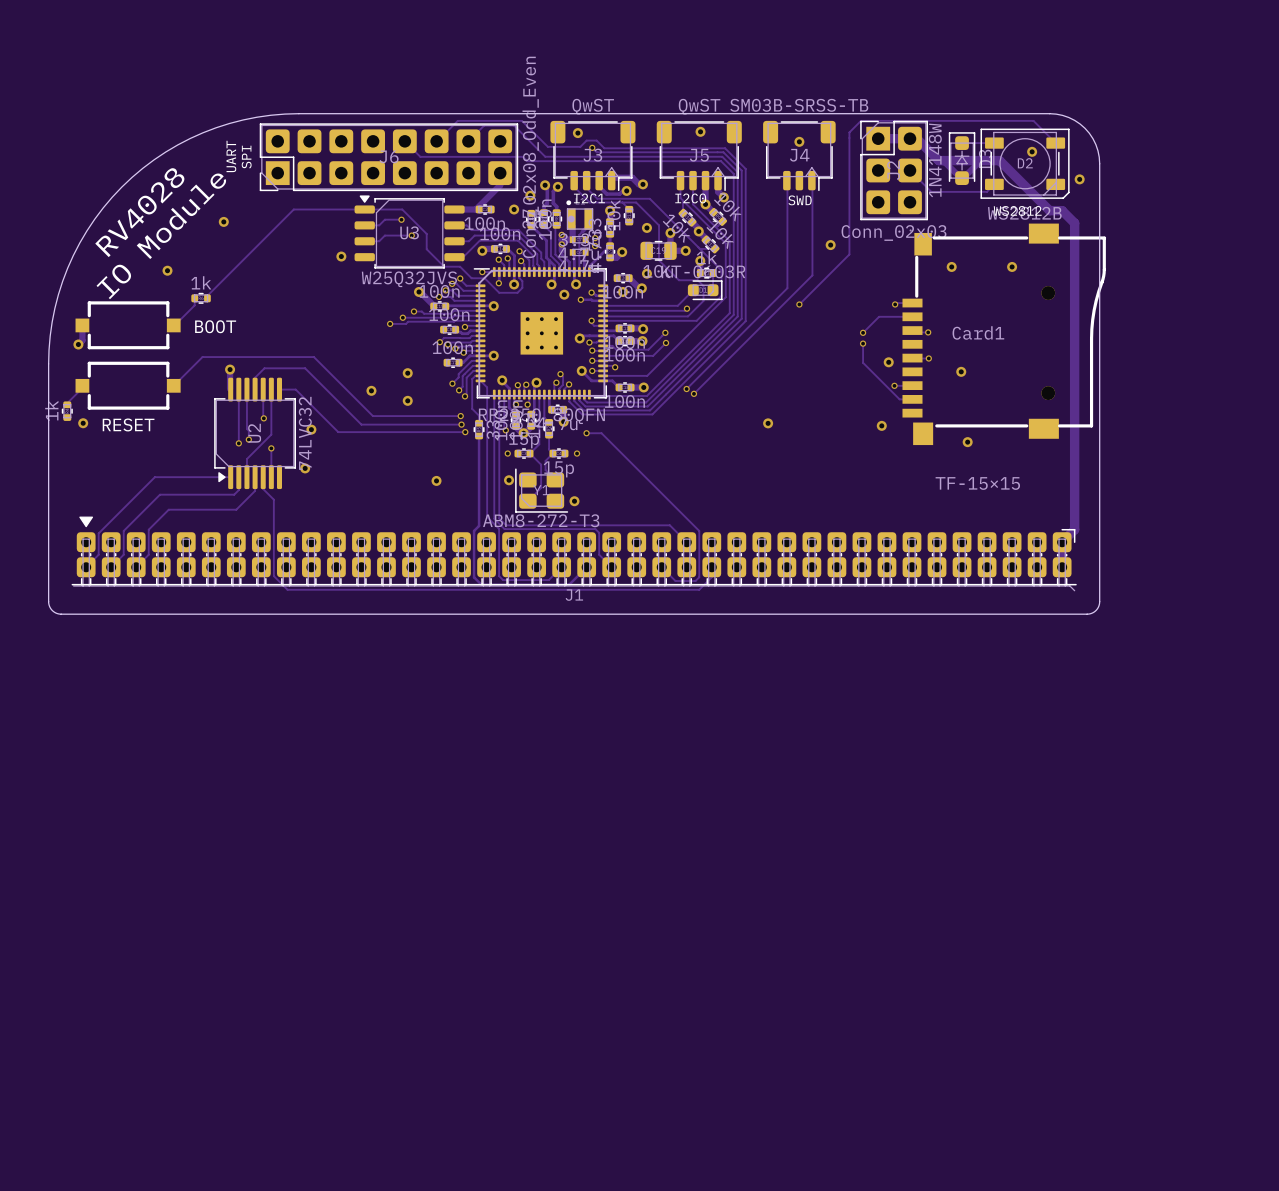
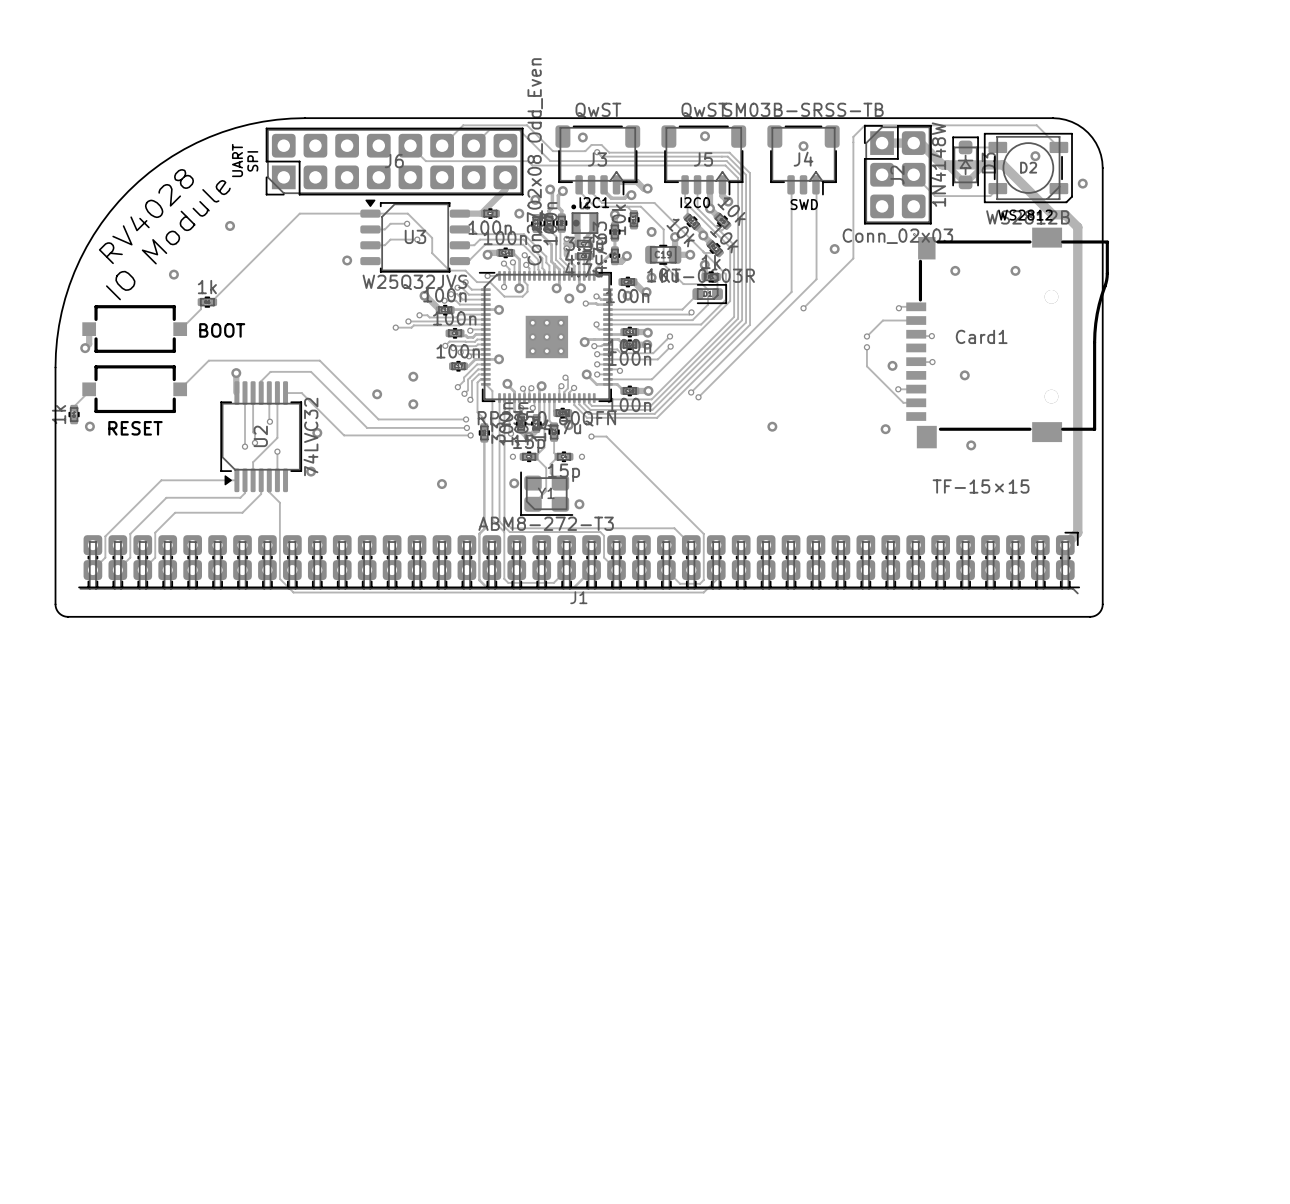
J1 footprint: [71, 516, 1077, 592] -> [78, 531, 1080, 595]

